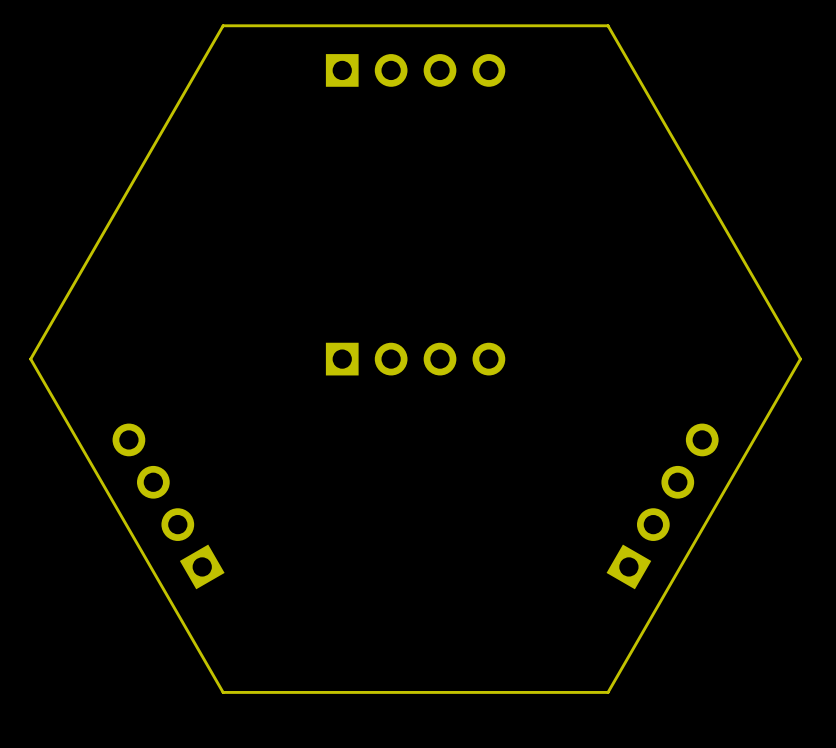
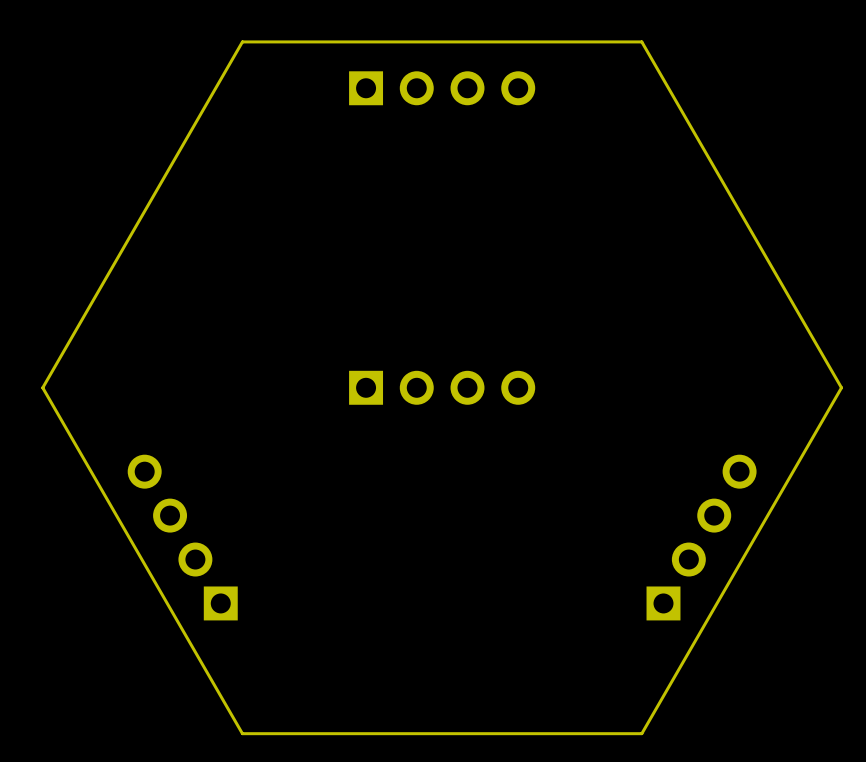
part footprint: [112, 423, 225, 590] -> [127, 454, 238, 621]
part footprint: [606, 423, 719, 590] -> [646, 454, 757, 621]

